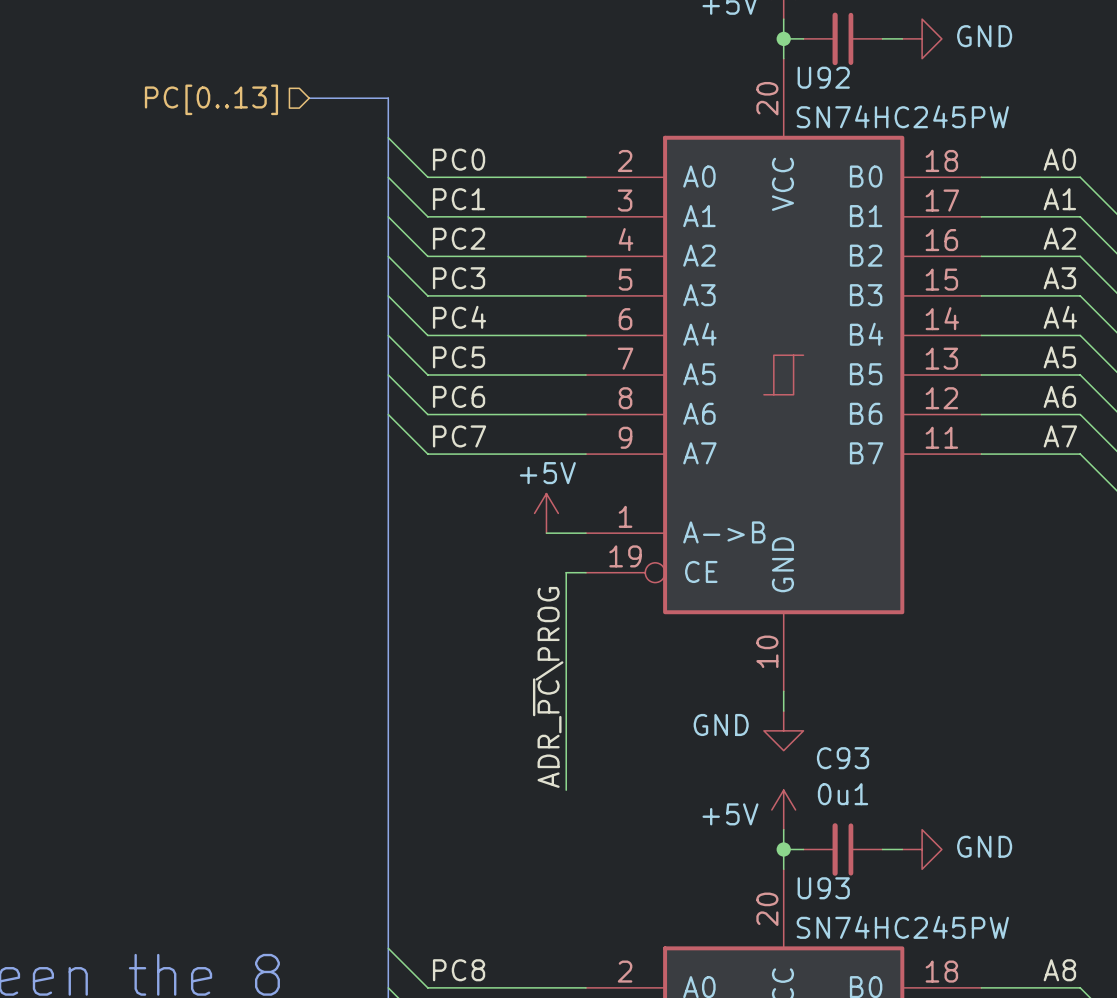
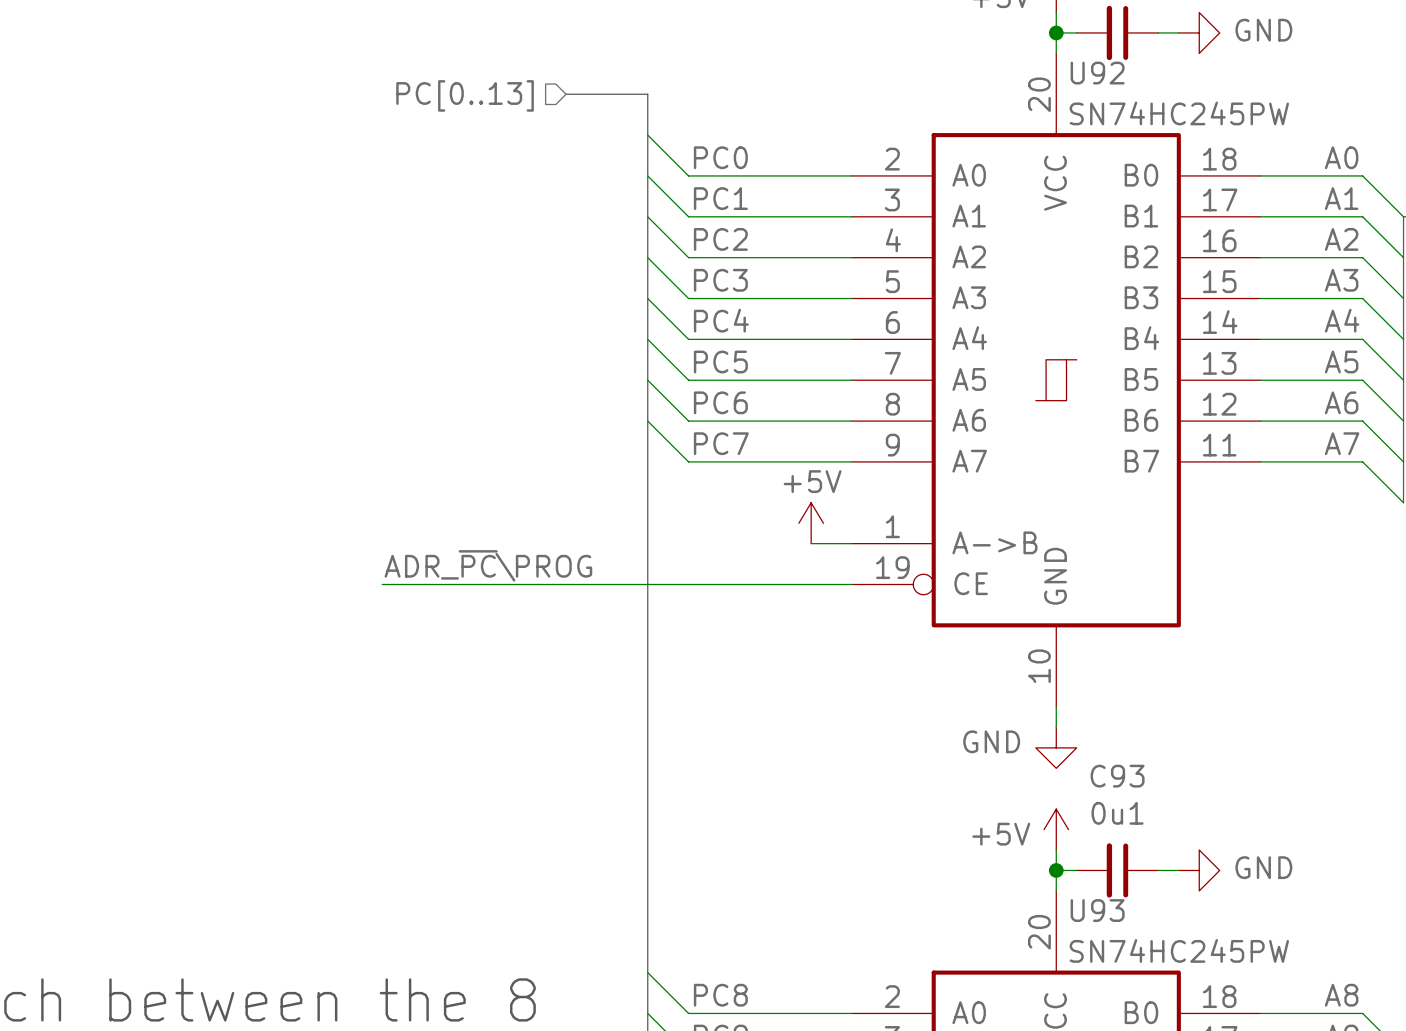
label: none -> ADR_~{PC}\PROG (488, 565)
wire: (566, 572) (566, 790) -> (831, 584) (382, 584)
label: ADR_~{PC}\PROG (548, 687) -> none

